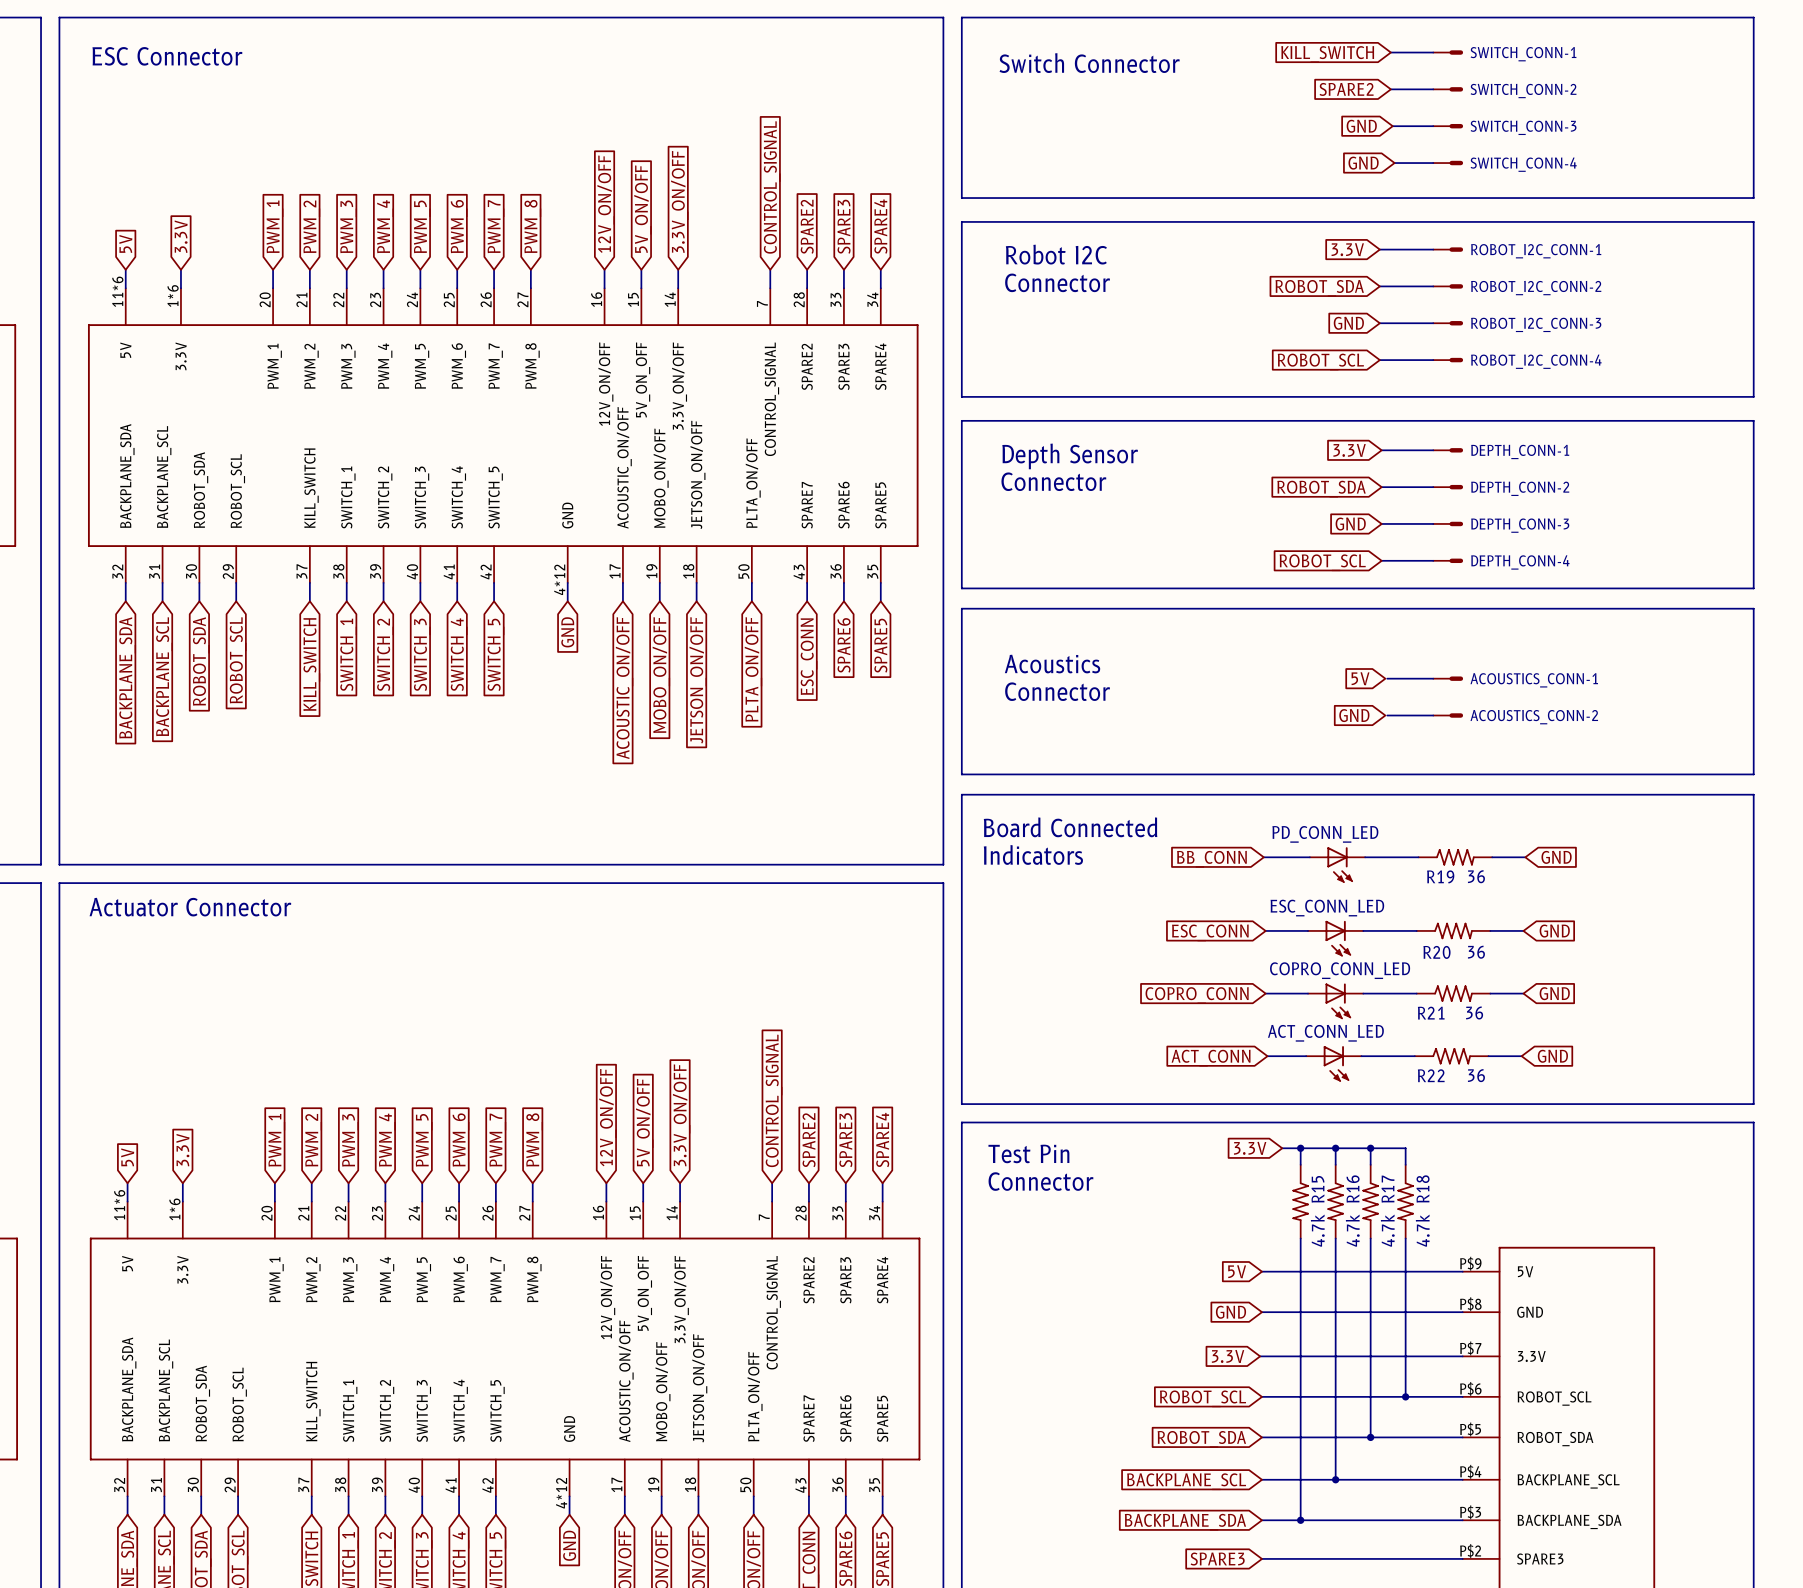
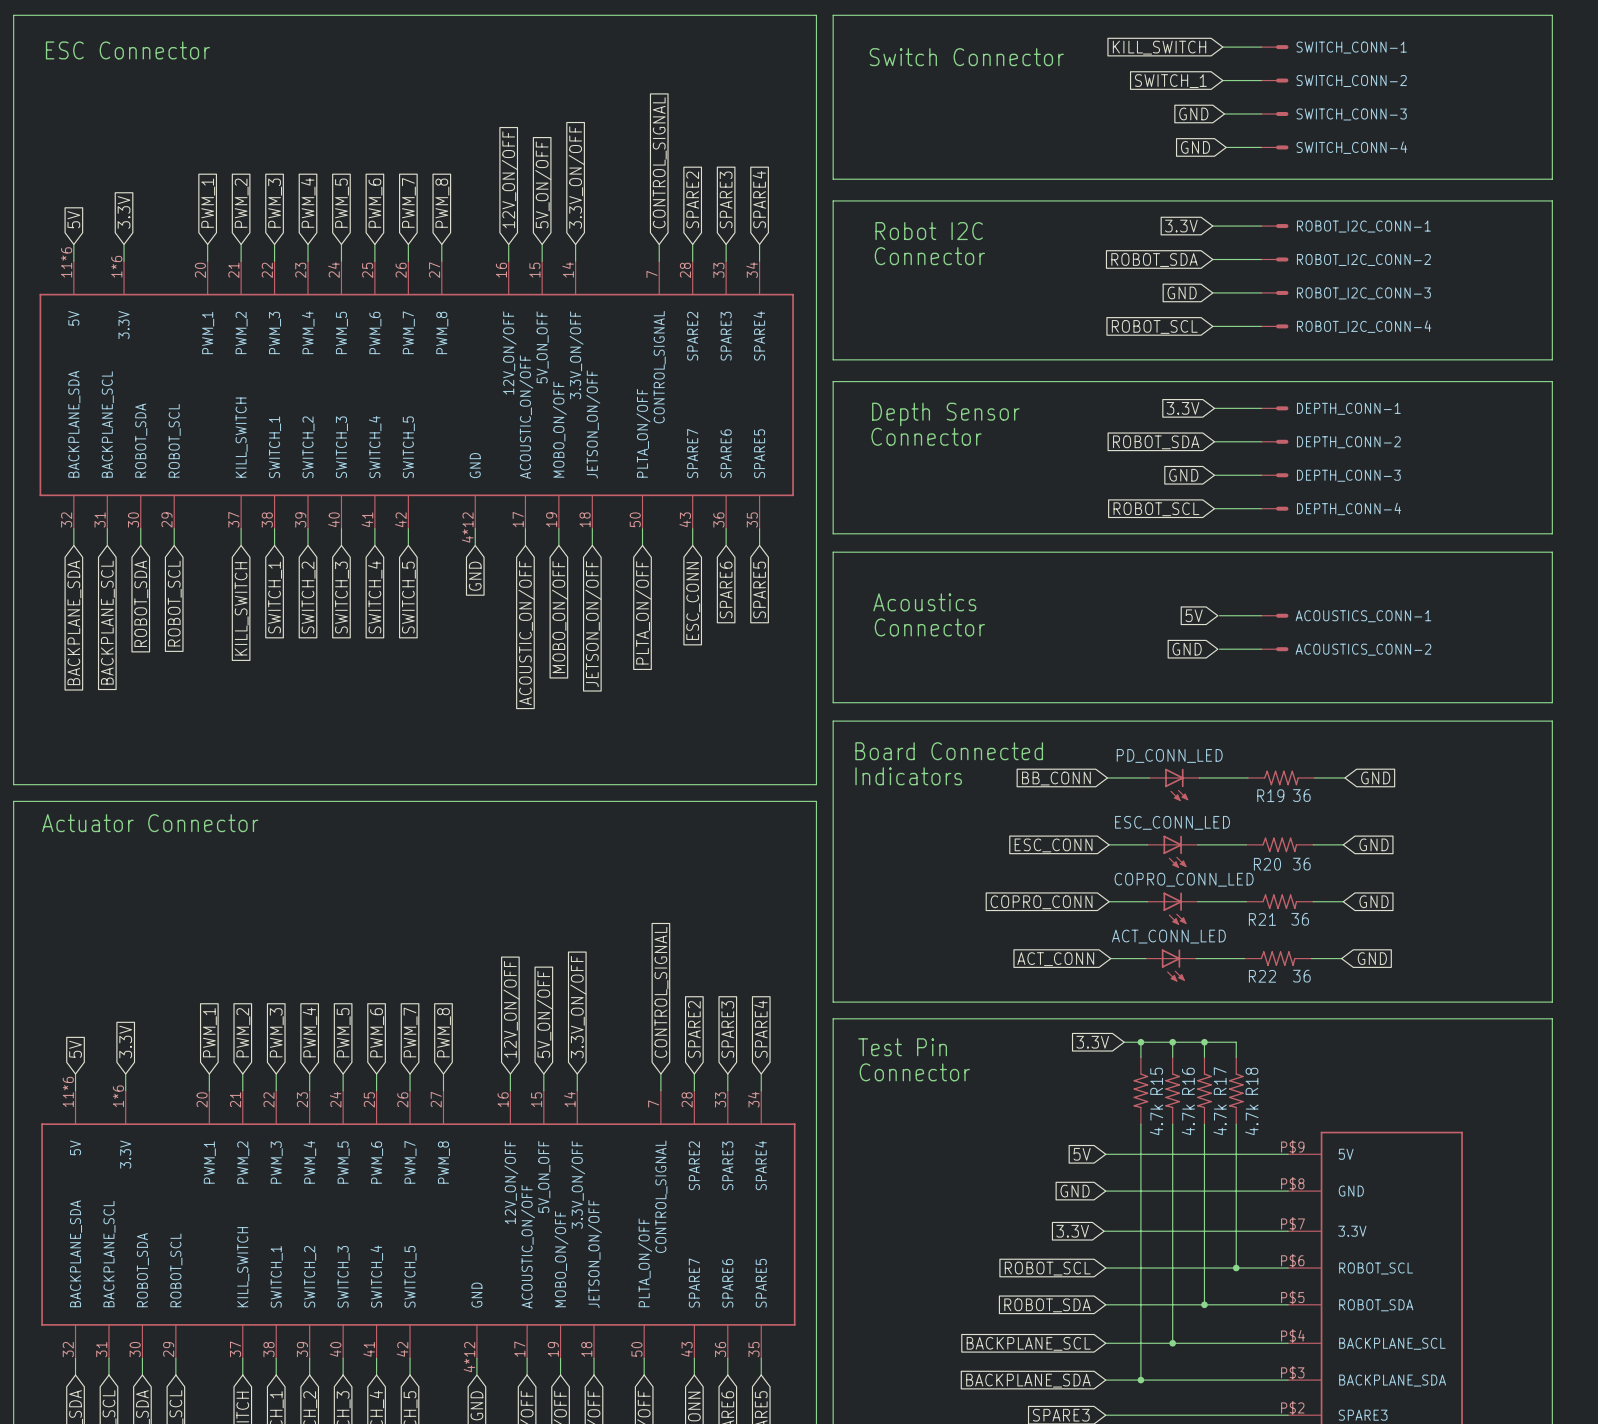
global label: SPARE2 (1346, 89) -> SWITCH_1 (1170, 81)

